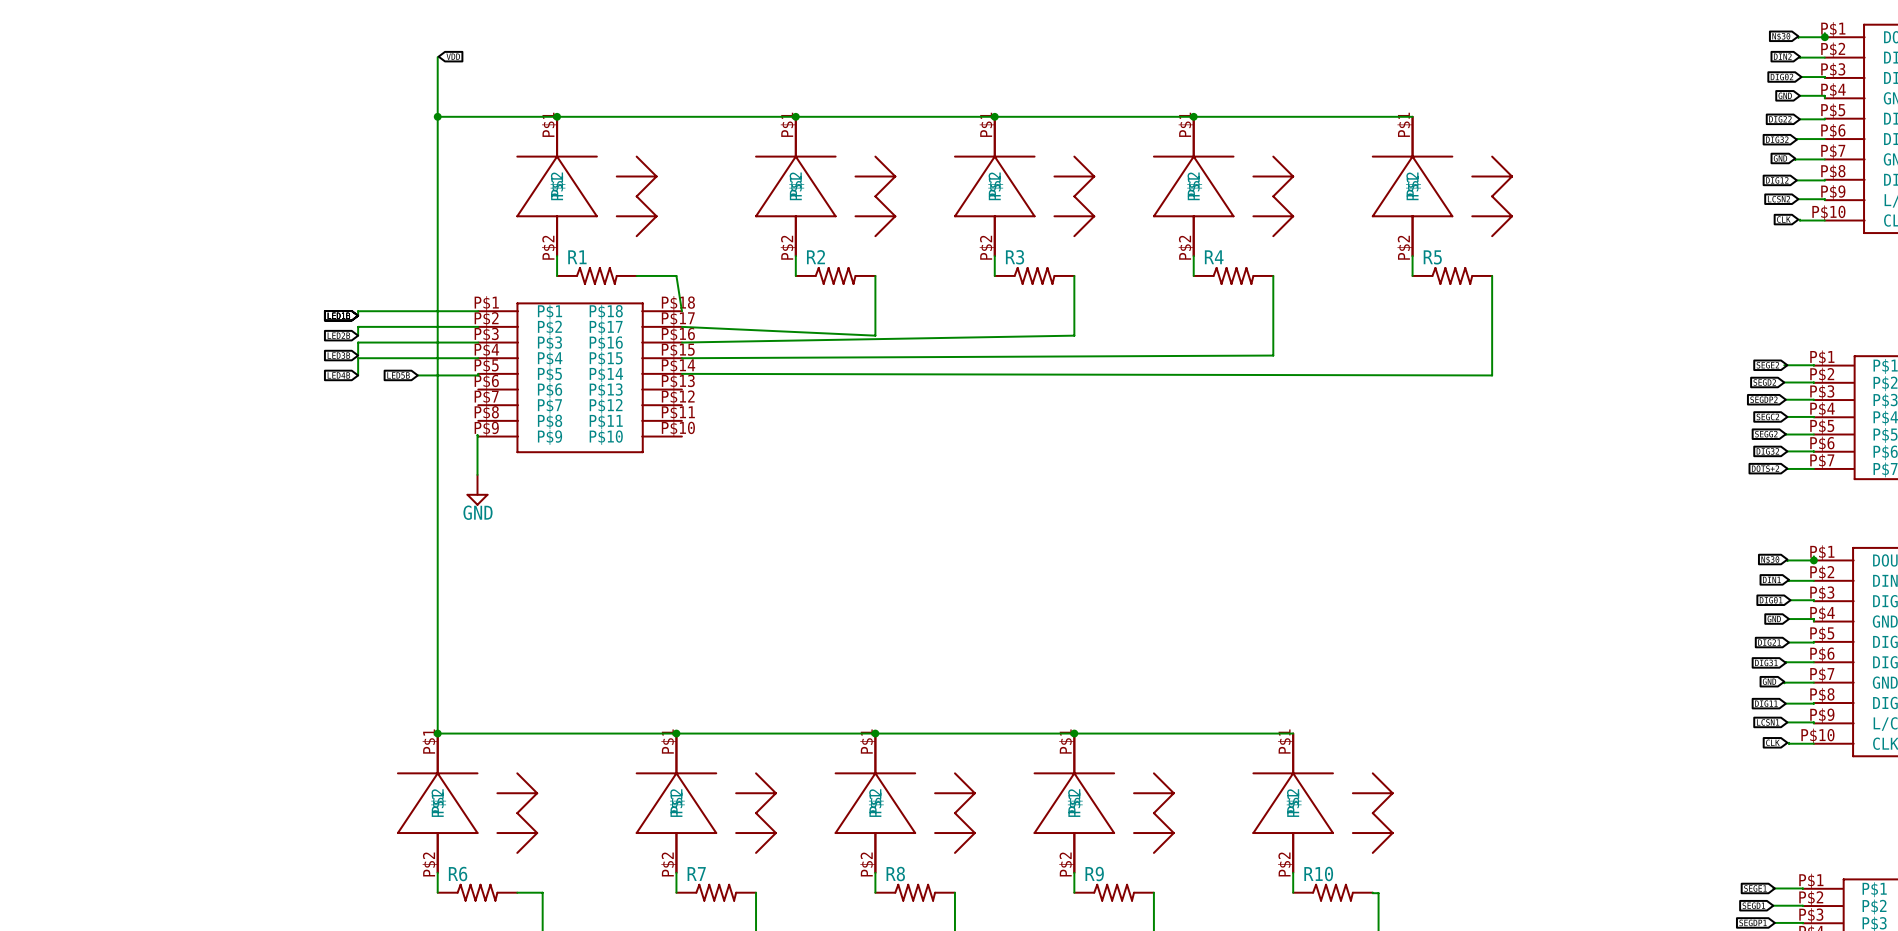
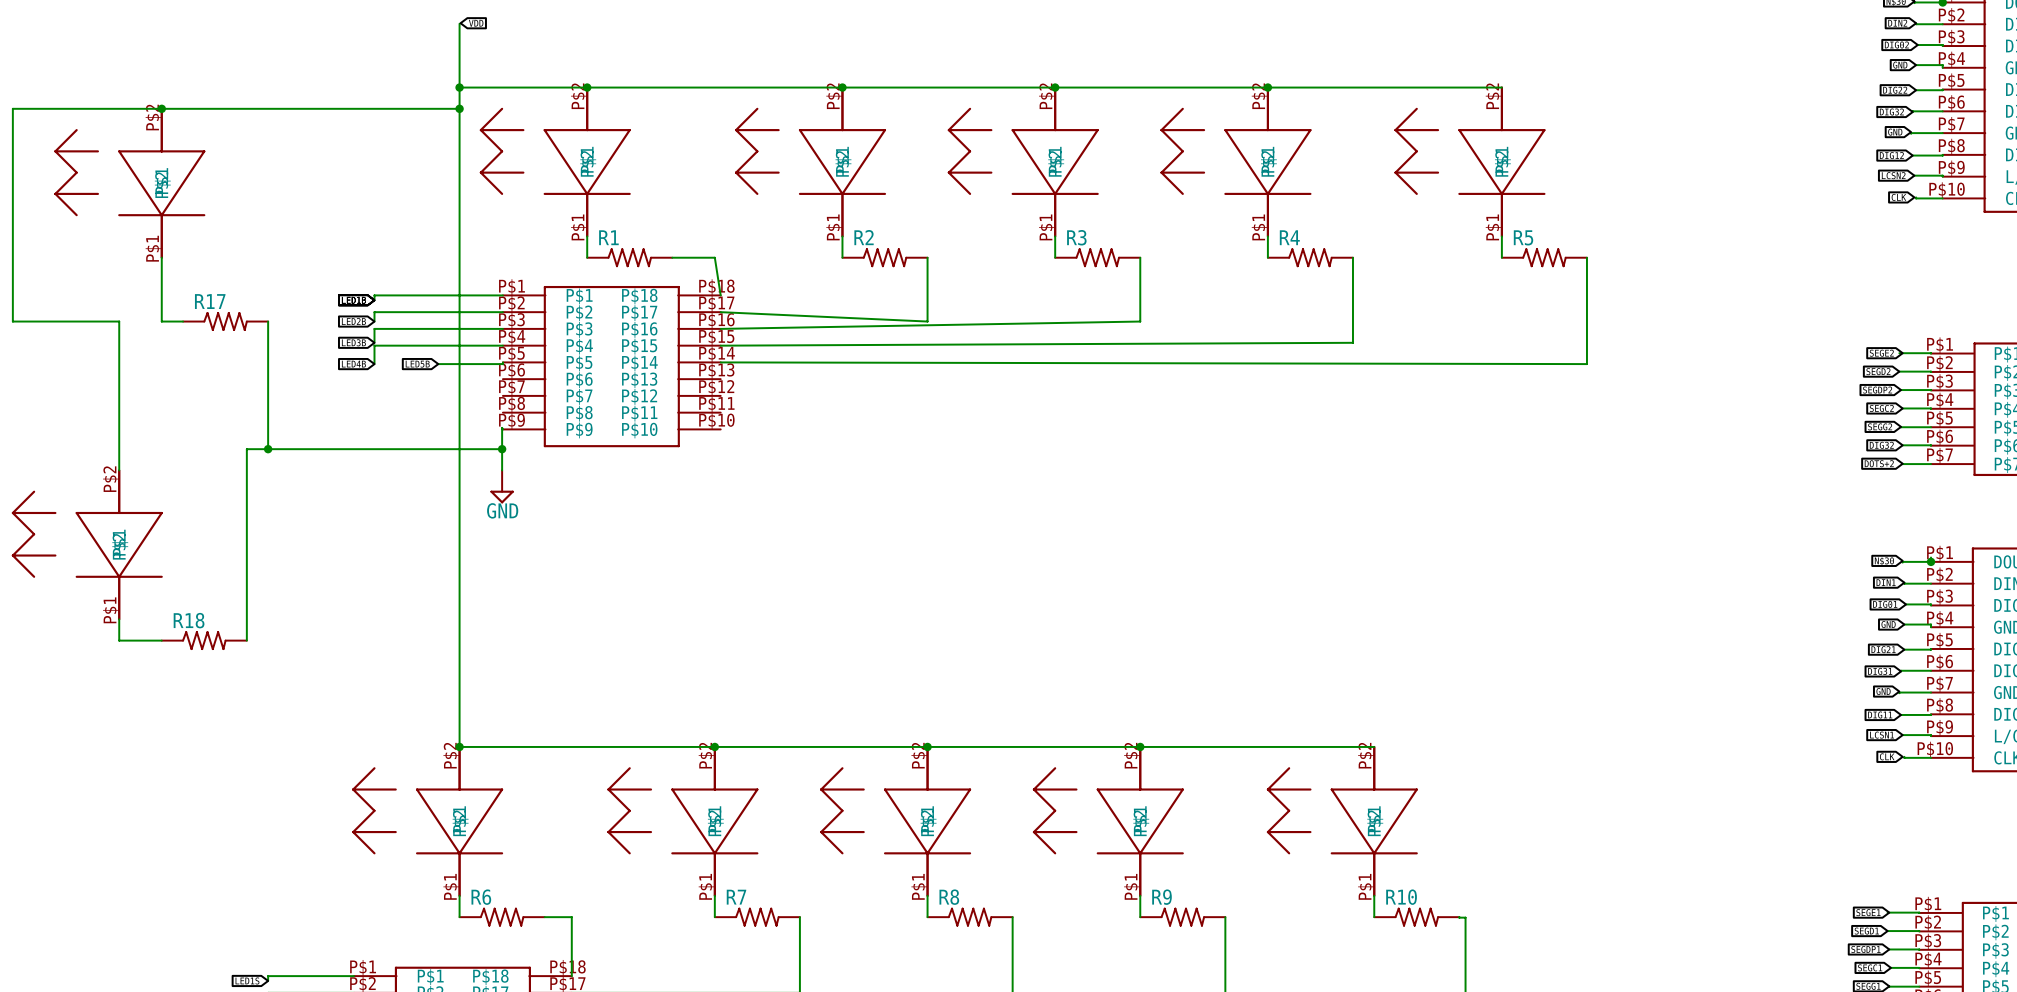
junction: none -> (161, 108)
wire: none -> (459, 108) (12, 108) (12, 321) (119, 321) (119, 470)
junction: none -> (459, 108)
part rotation: 0° (586, 186) -> 180° (555, 162)
part rotation: 0° (825, 186) -> 180° (810, 162)
part rotation: 0° (1024, 186) -> 180° (1023, 162)
part rotation: 0° (1223, 186) -> 180° (1235, 162)
part rotation: 0° (1442, 186) -> 180° (1469, 162)
part: none -> (129, 183)
wire: none -> (161, 257) (161, 321) (183, 321)
R17: none -> (225, 321)
wire: none -> (268, 321) (268, 449)
junction: none -> (268, 449)
wire: none -> (502, 449) (246, 449) (246, 640)
junction: none -> (502, 449)
part: none -> (87, 544)
wire: none -> (119, 619) (119, 640) (161, 640)
R18: none -> (204, 640)
part rotation: 0° (467, 803) -> 180° (427, 821)
part rotation: 0° (706, 803) -> 180° (682, 821)
part rotation: 0° (905, 803) -> 180° (895, 821)
part rotation: 0° (1104, 803) -> 180° (1108, 821)
part rotation: 0° (1323, 803) -> 180° (1342, 821)

